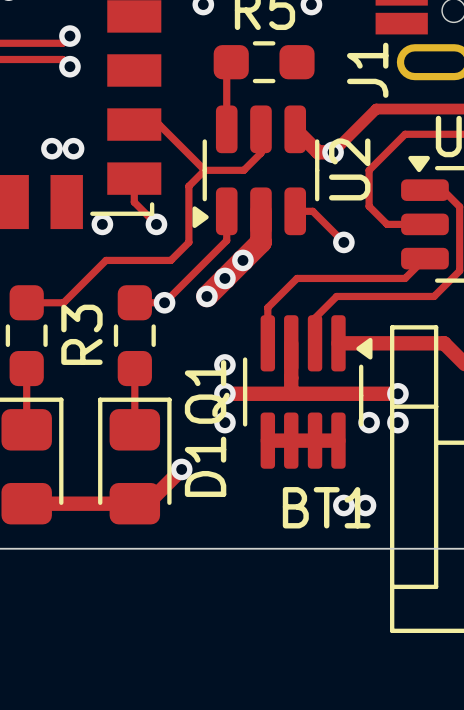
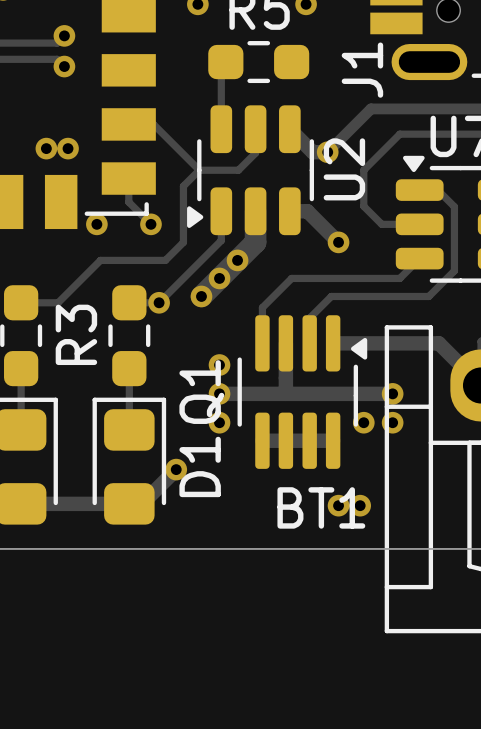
track width: thin (295, 211) (312, 211) (343, 242) -> thick (289, 211) (307, 211) (338, 242)

